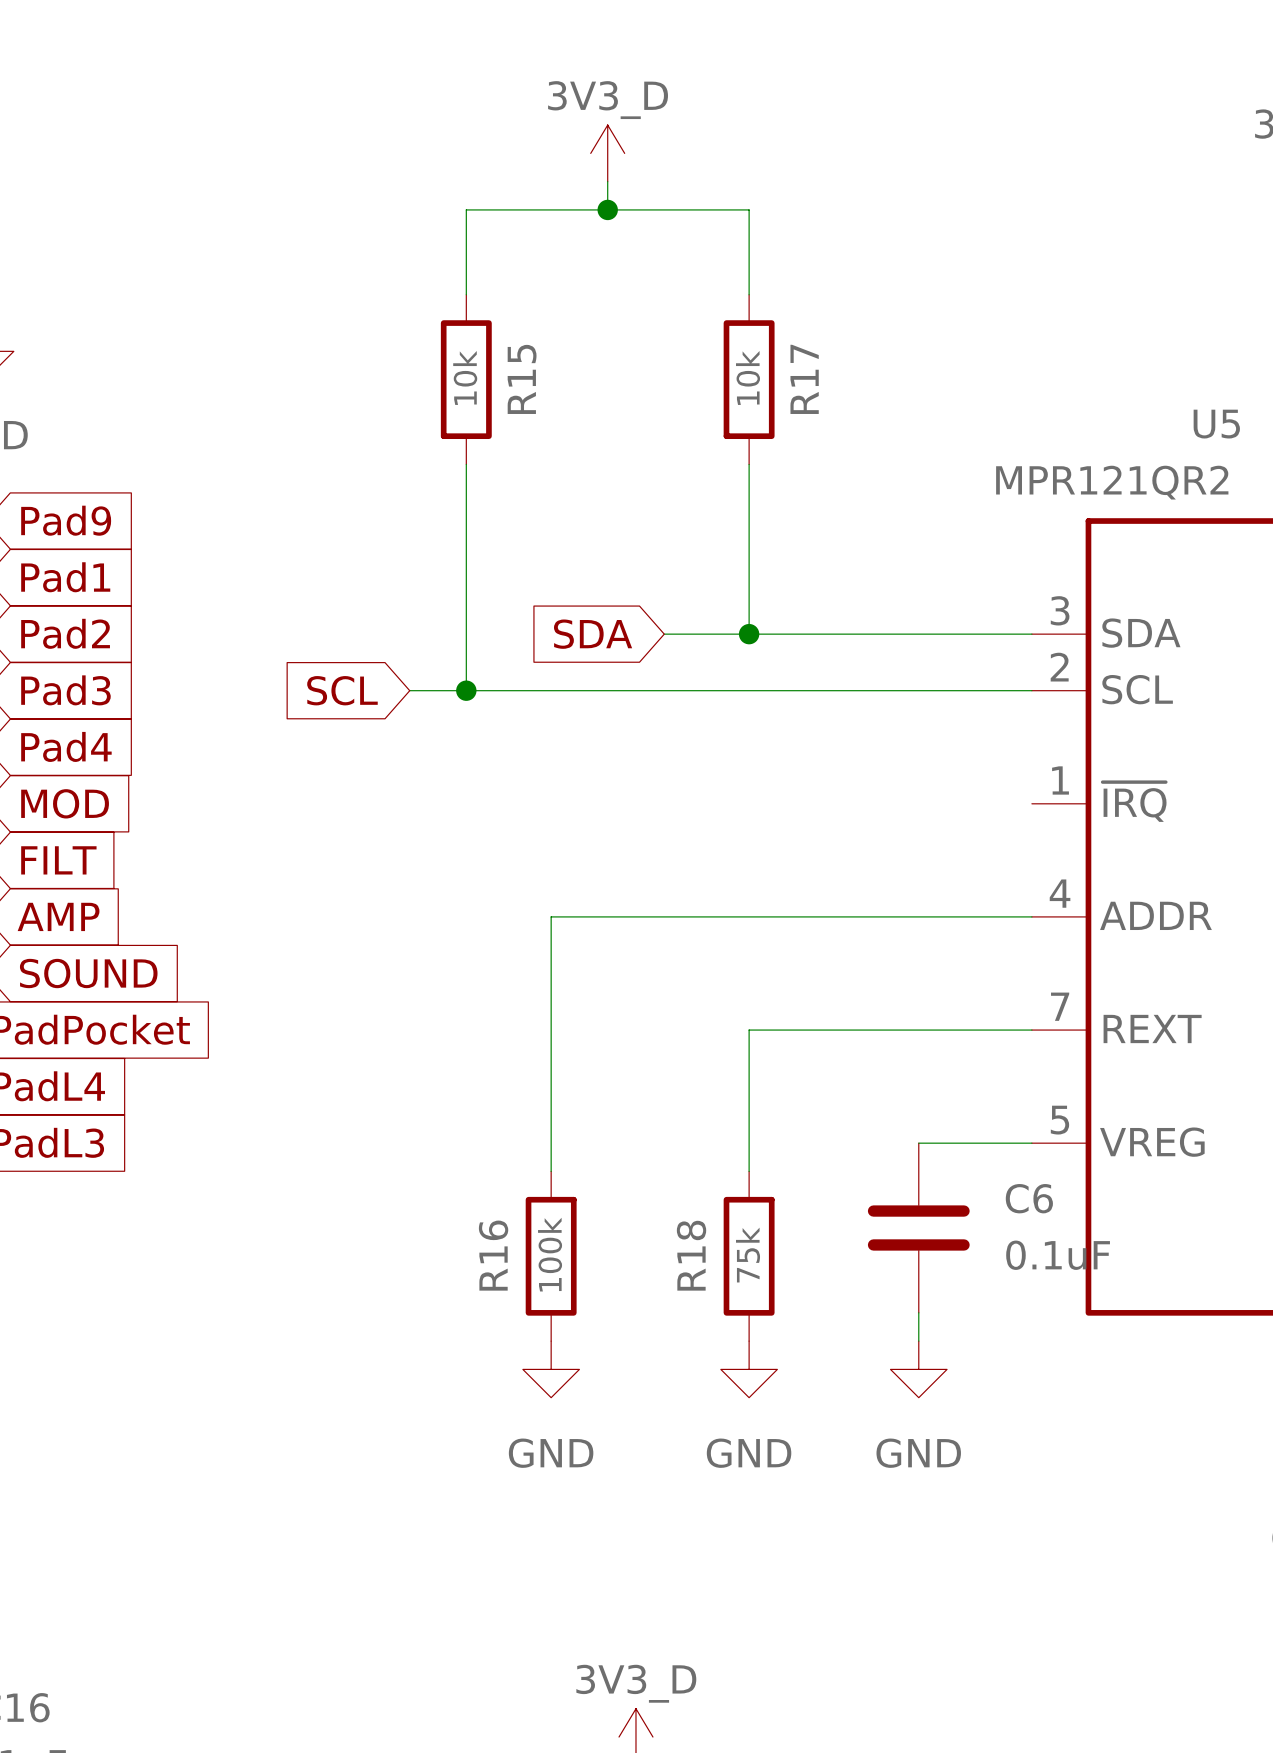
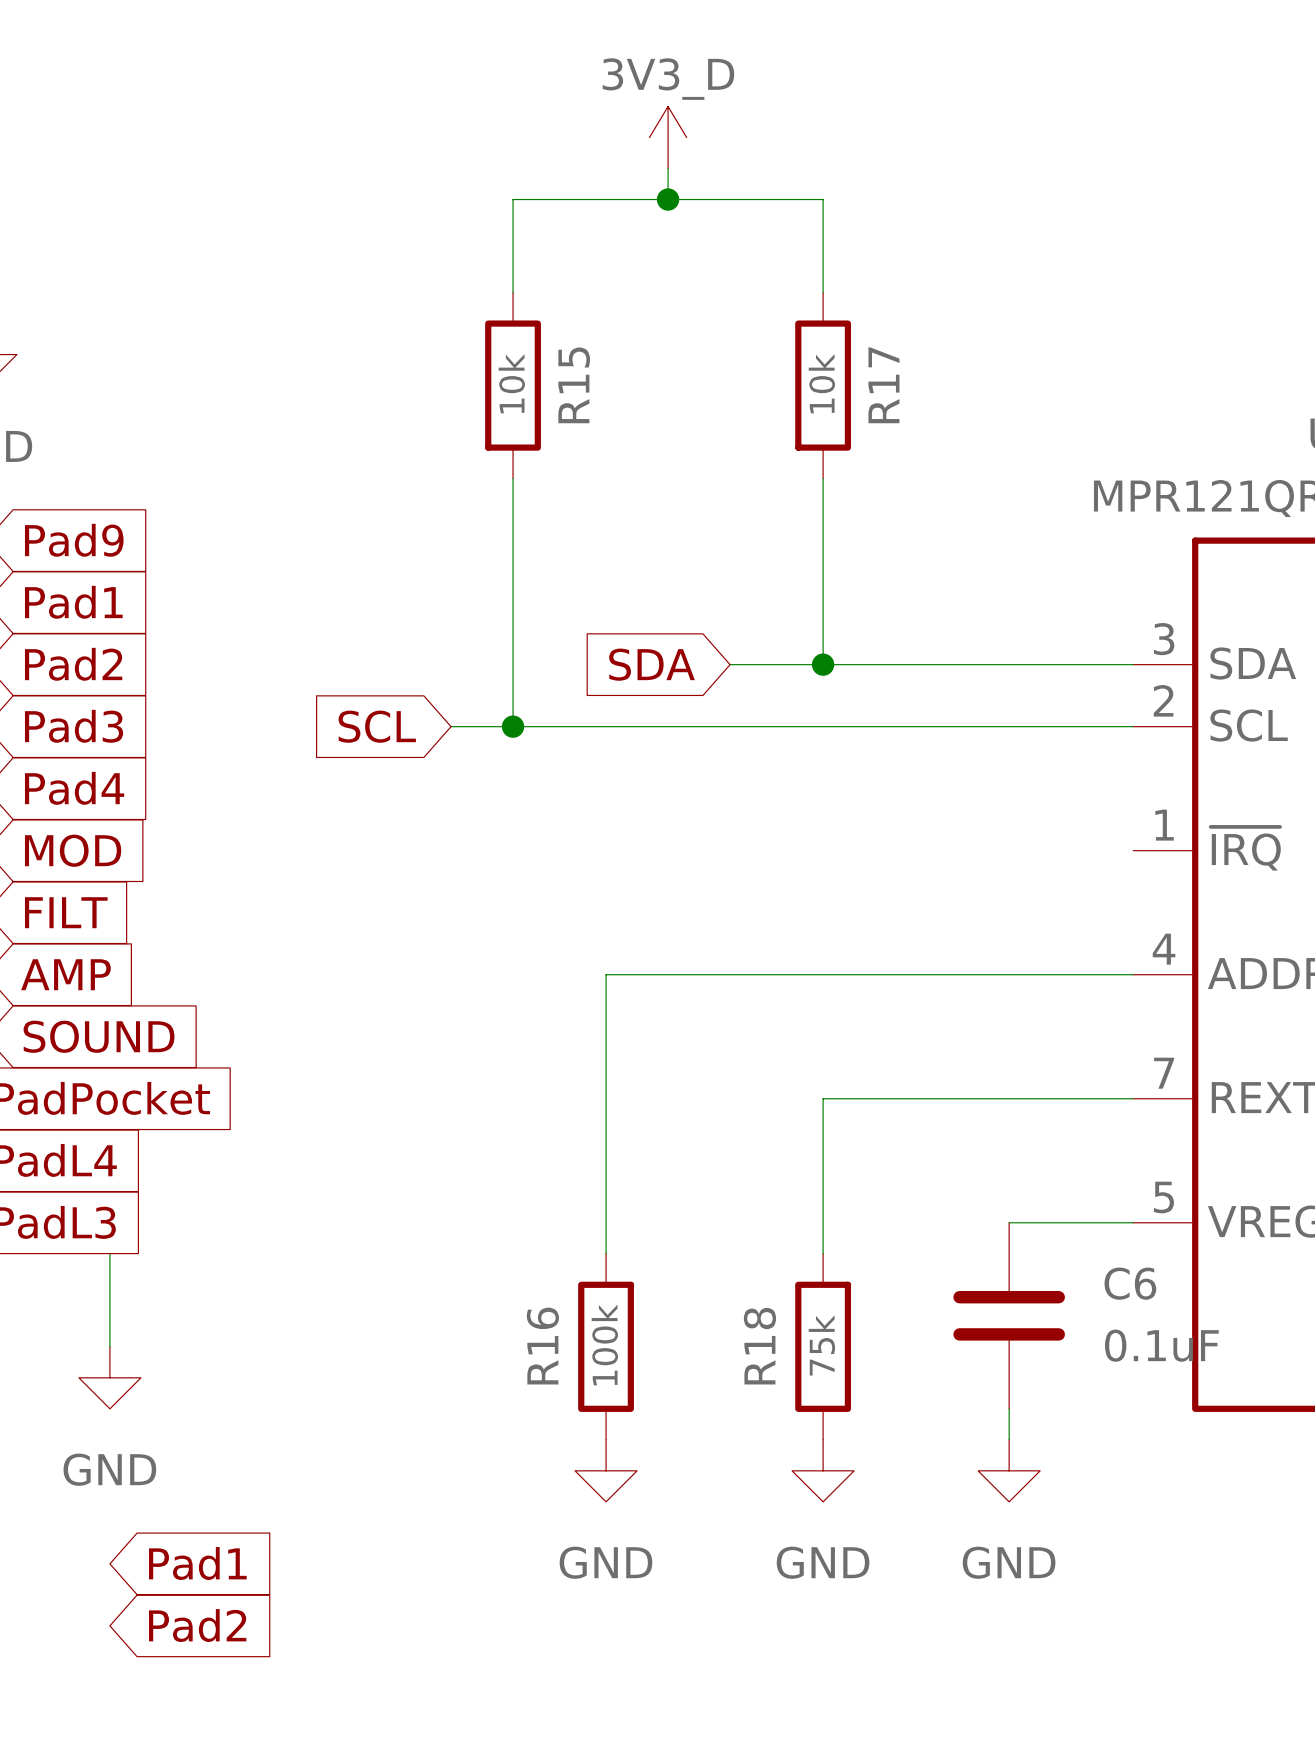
wire: none -> (109, 1253) (109, 1346)
power symbol: none -> GND (109, 1377)
global label: none -> Pad1 (197, 1563)
global label: none -> Pad2 (197, 1625)

